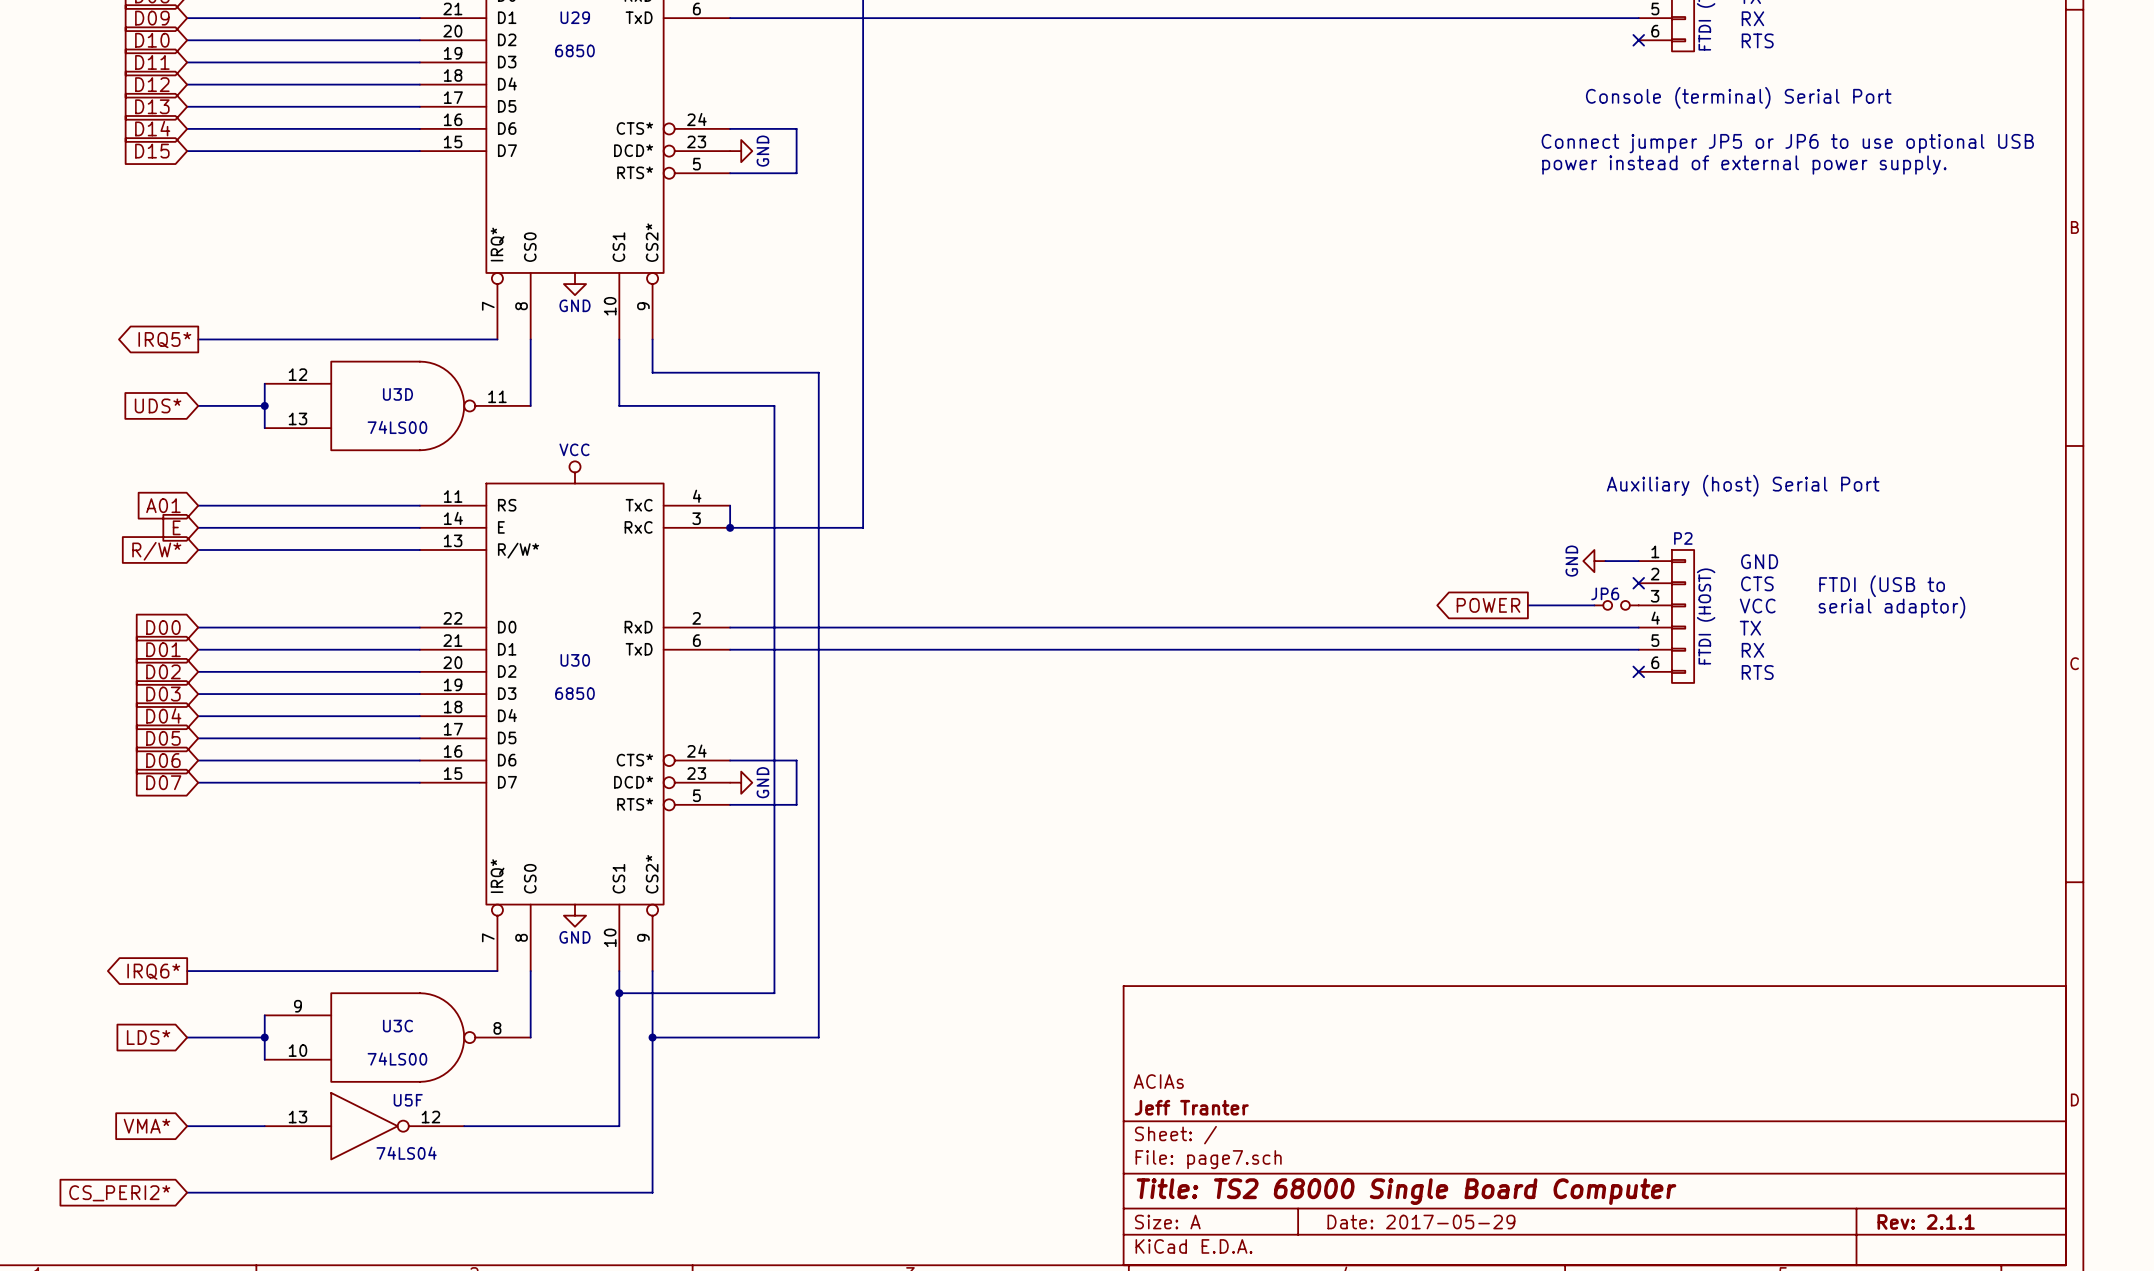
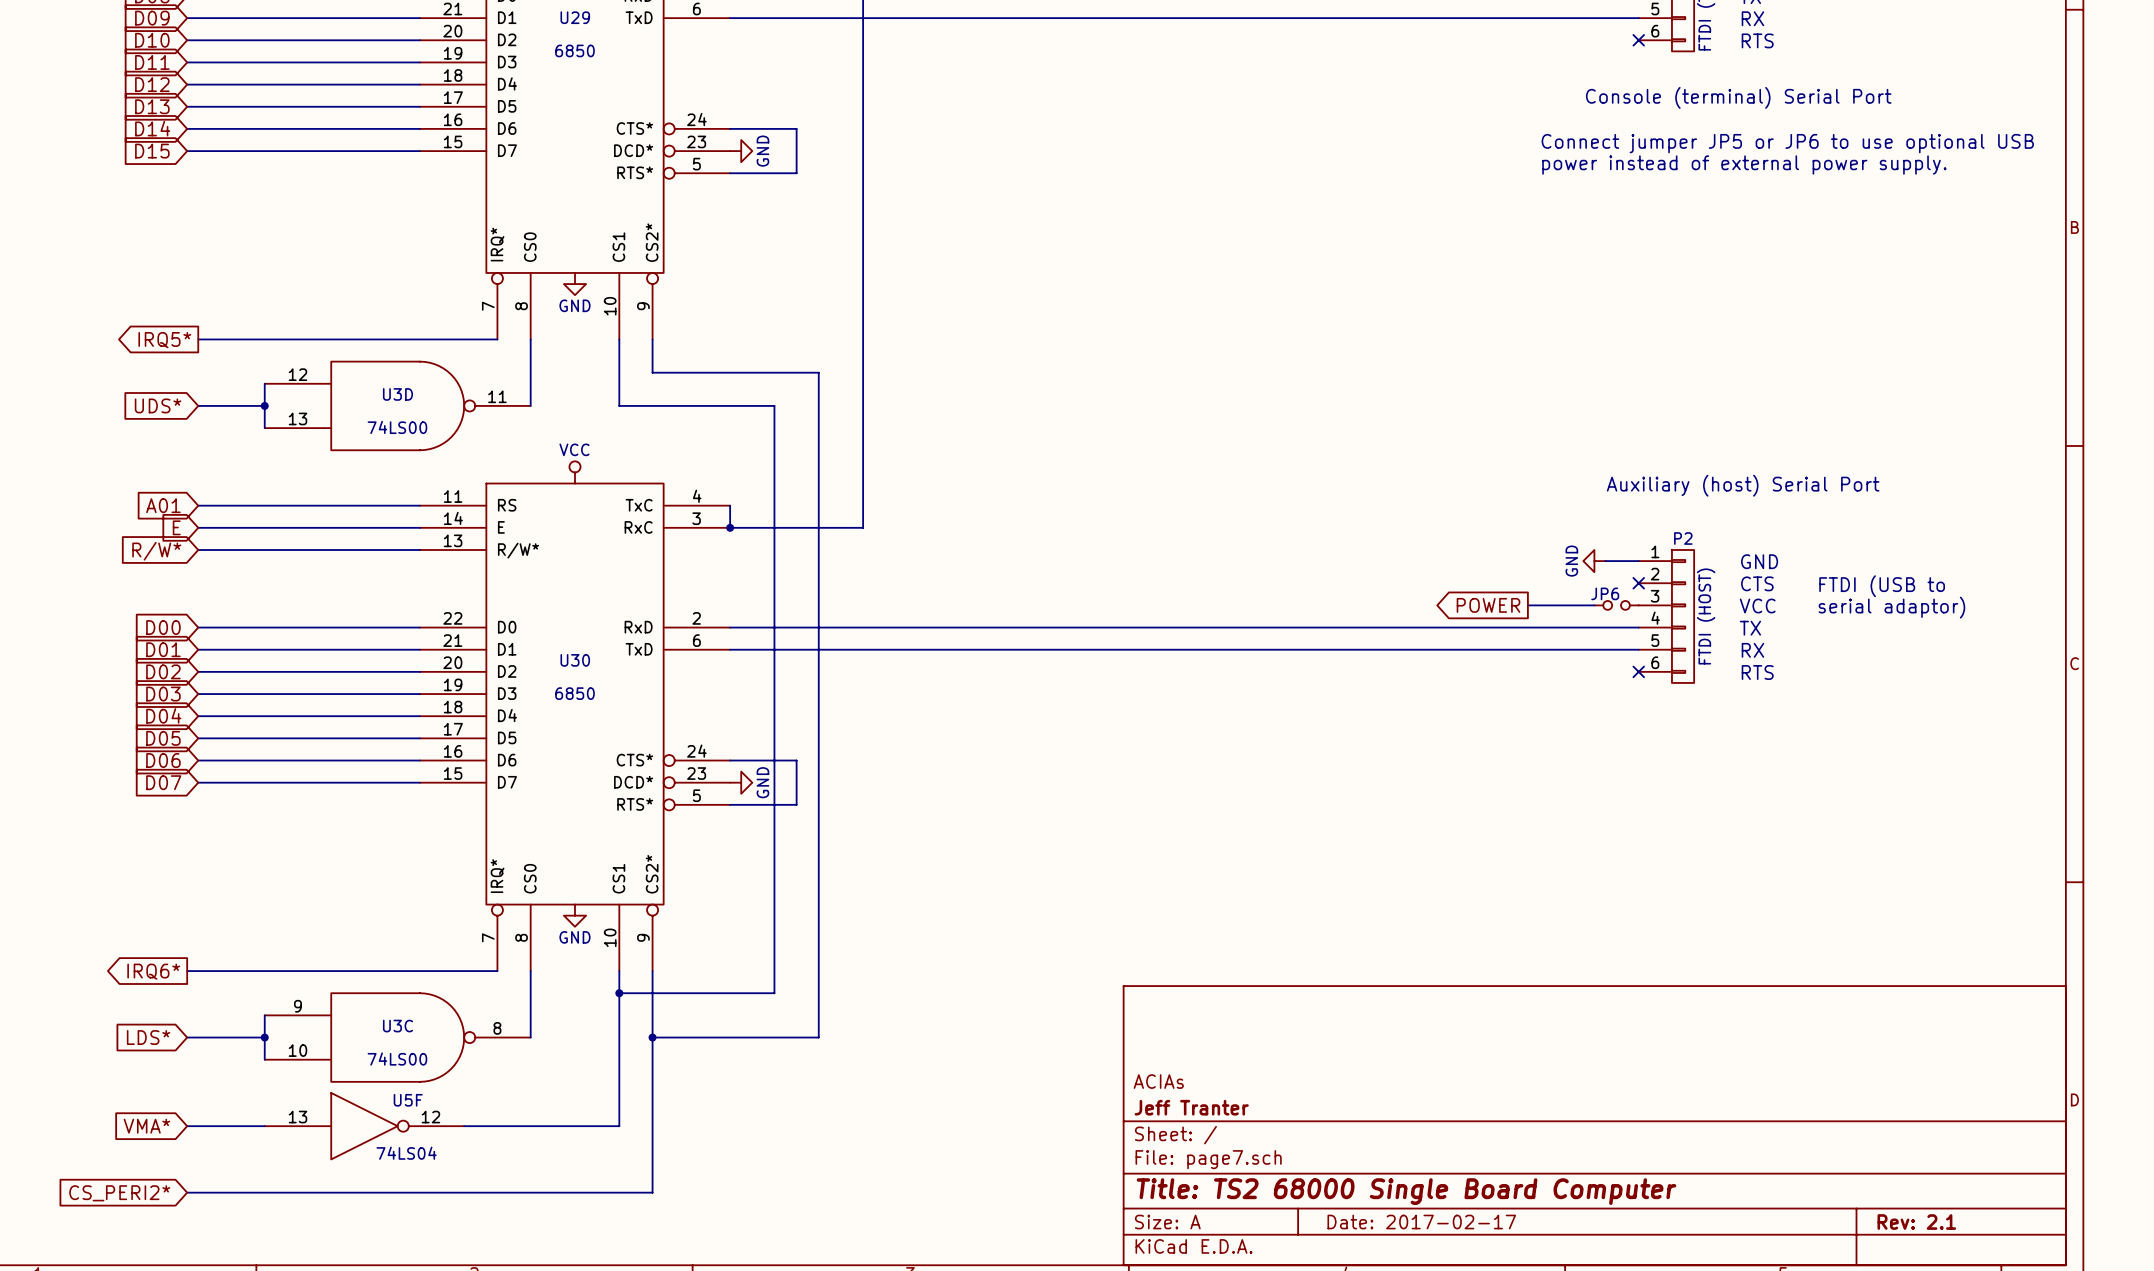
title block: Date: 2017-05-29 (1421, 1222) -> Date: 2017-02-17 (1421, 1222)
title block: Rev: 2.1.1 (1926, 1222) -> Rev: 2.1 (1916, 1222)

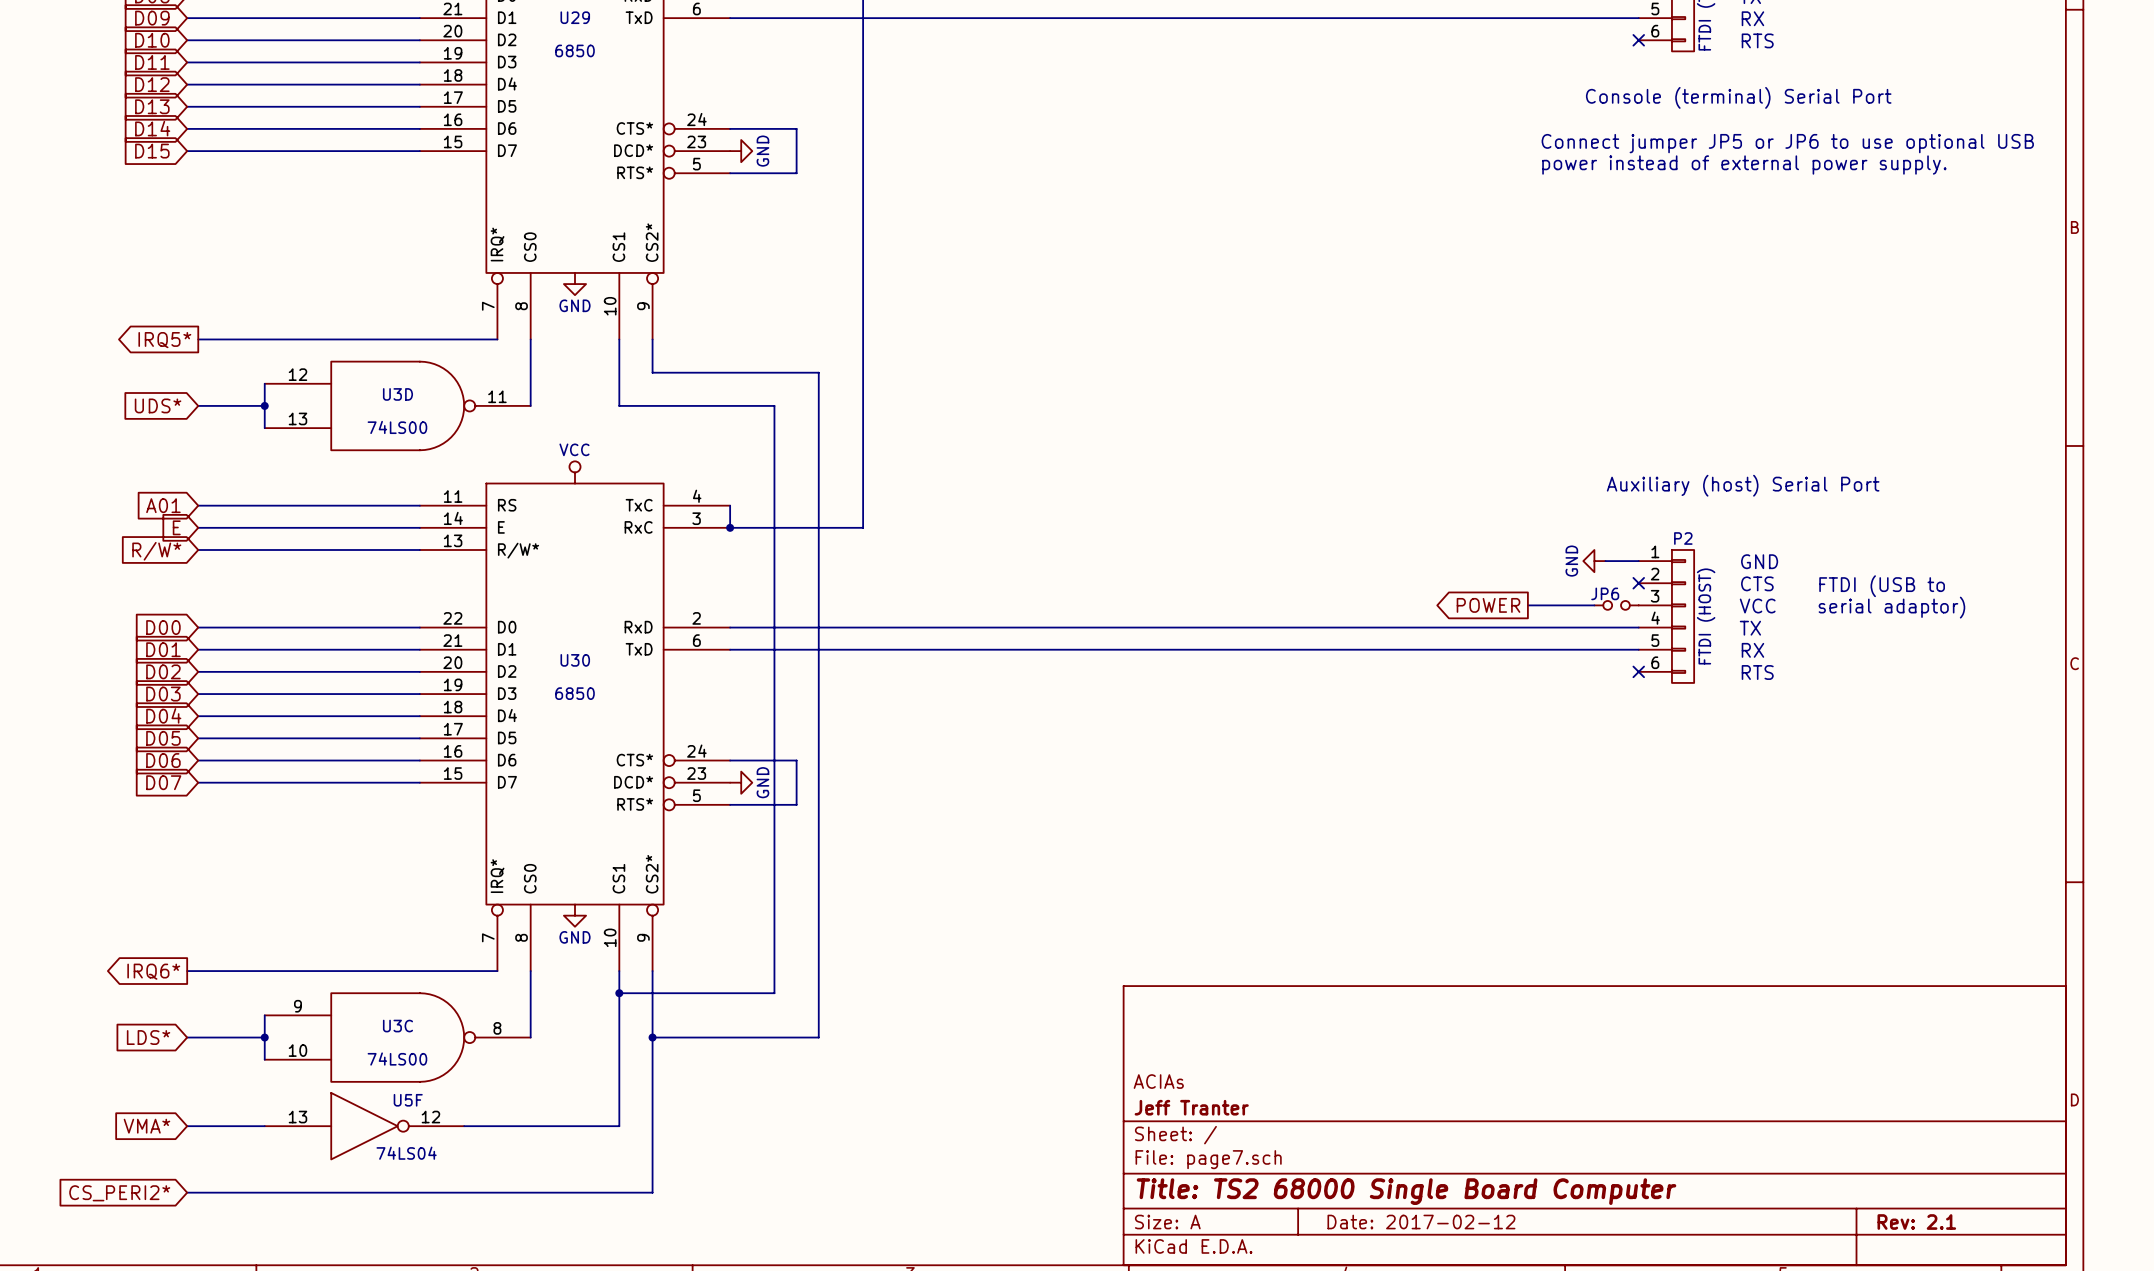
title block: Date: 2017-02-17 (1421, 1222) -> Date: 2017-02-12 (1421, 1222)

